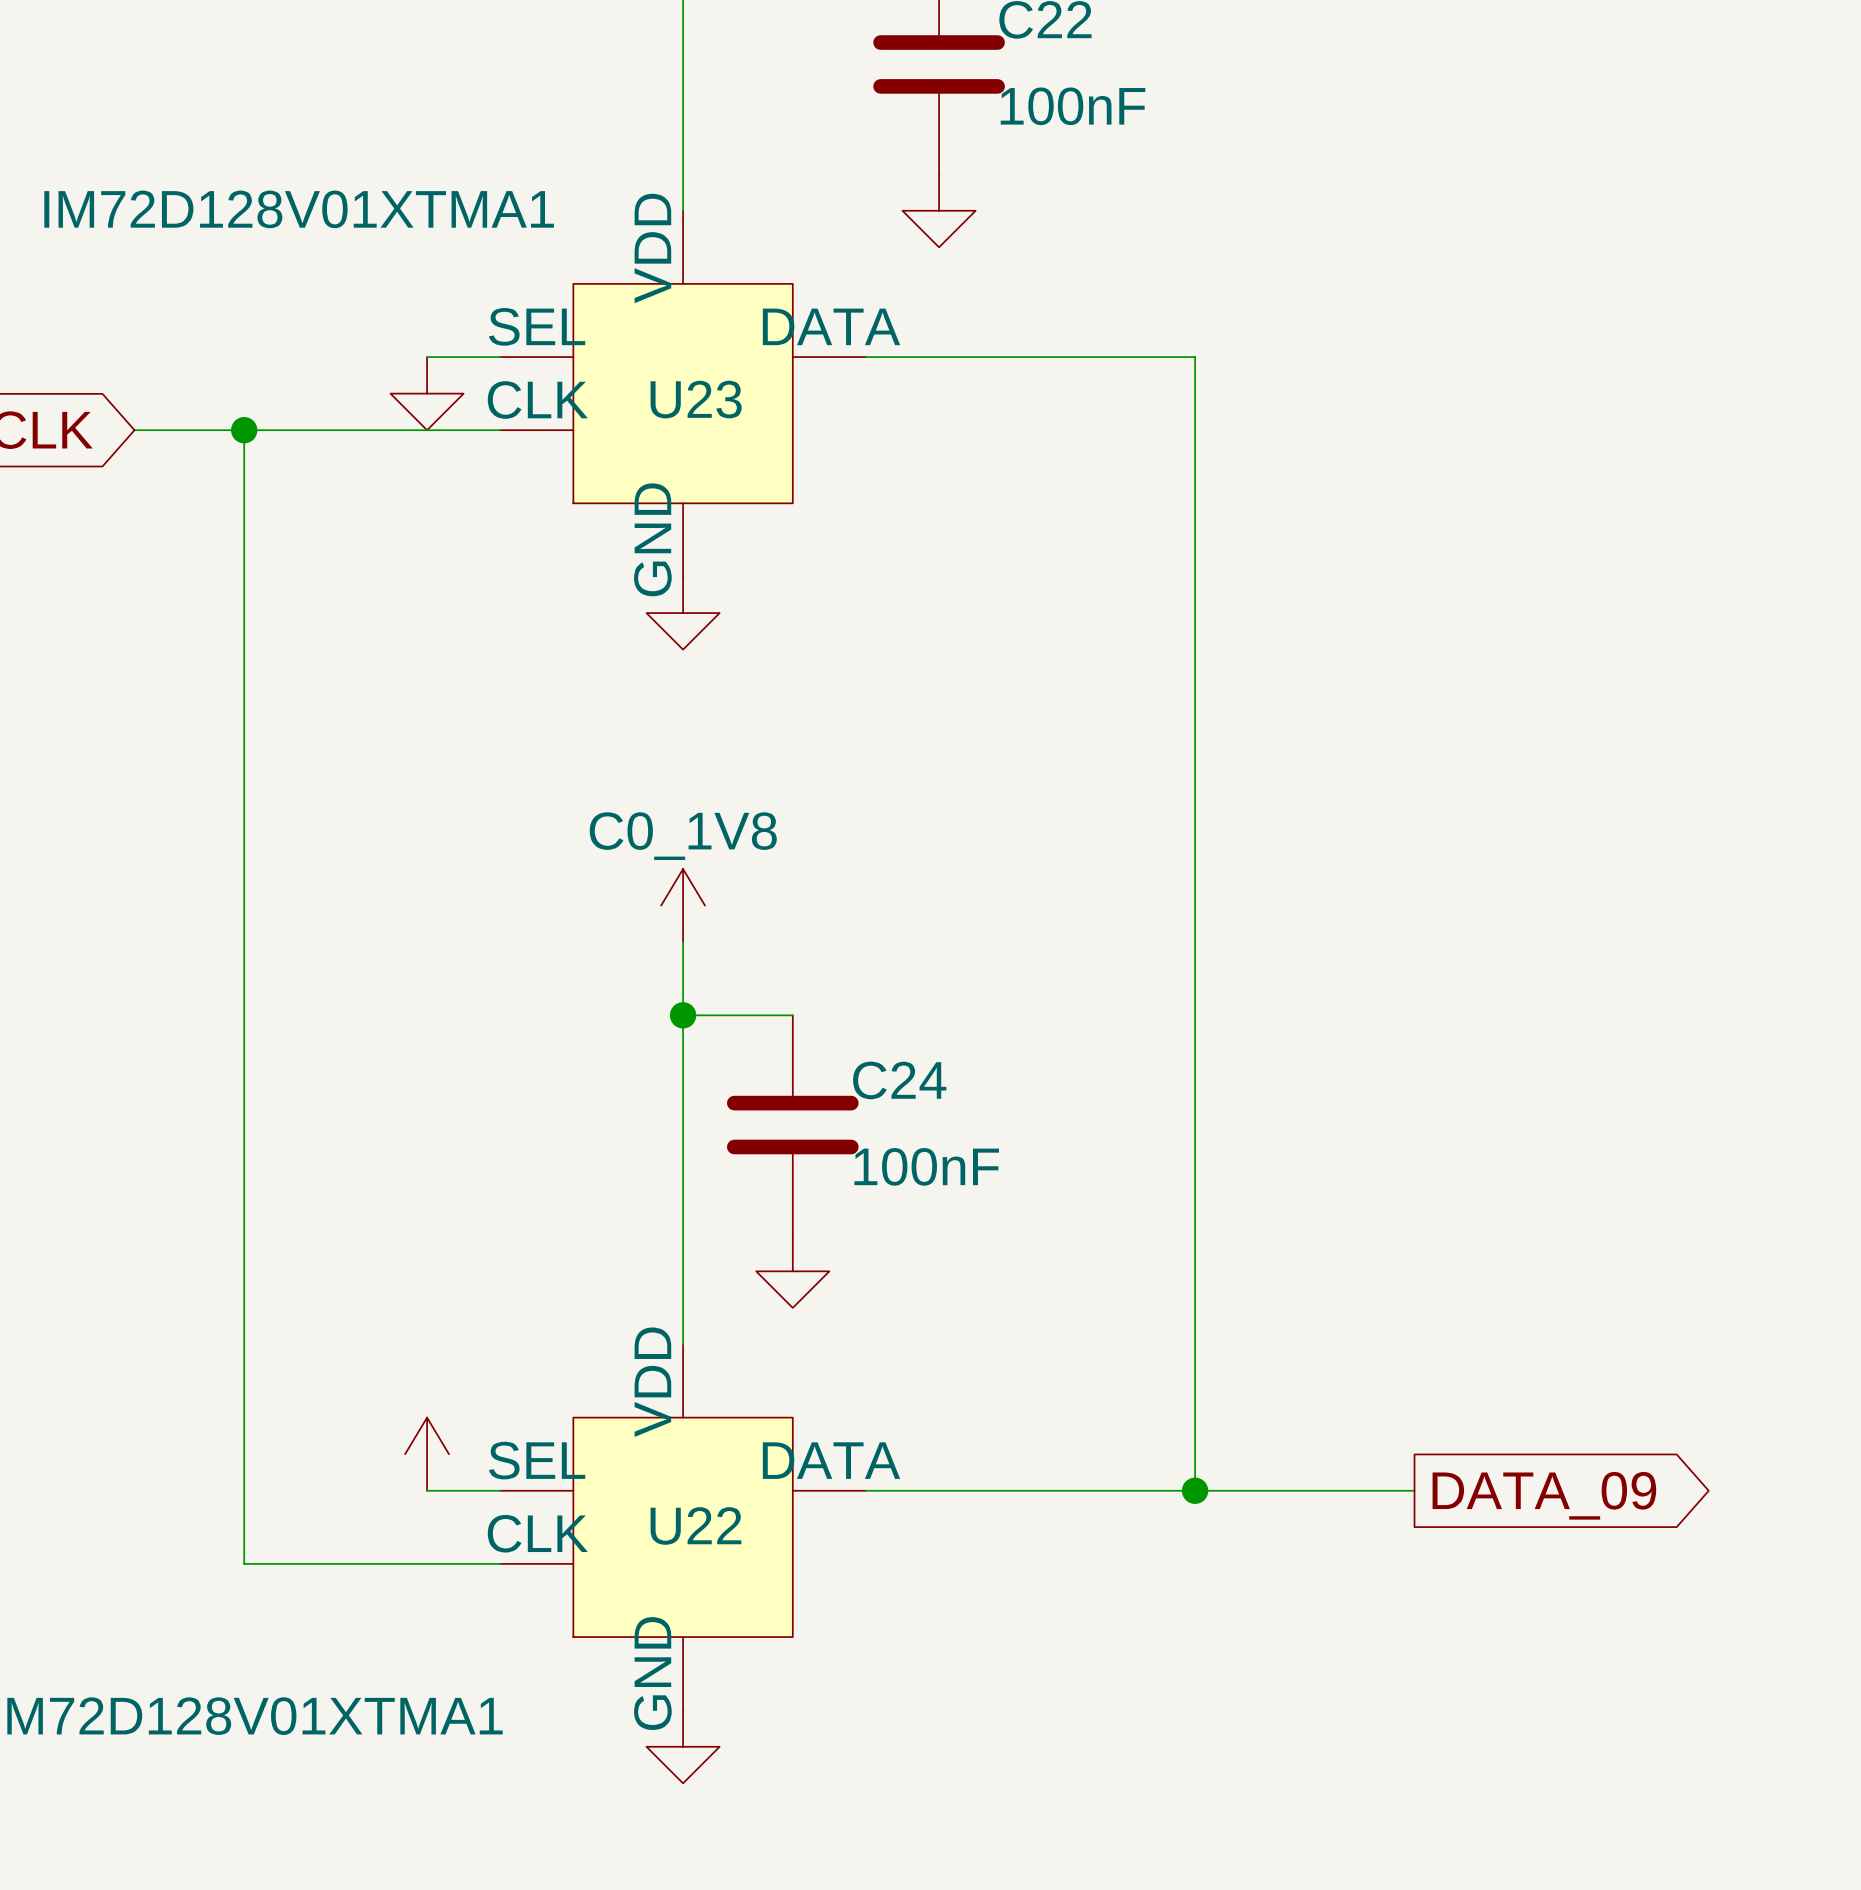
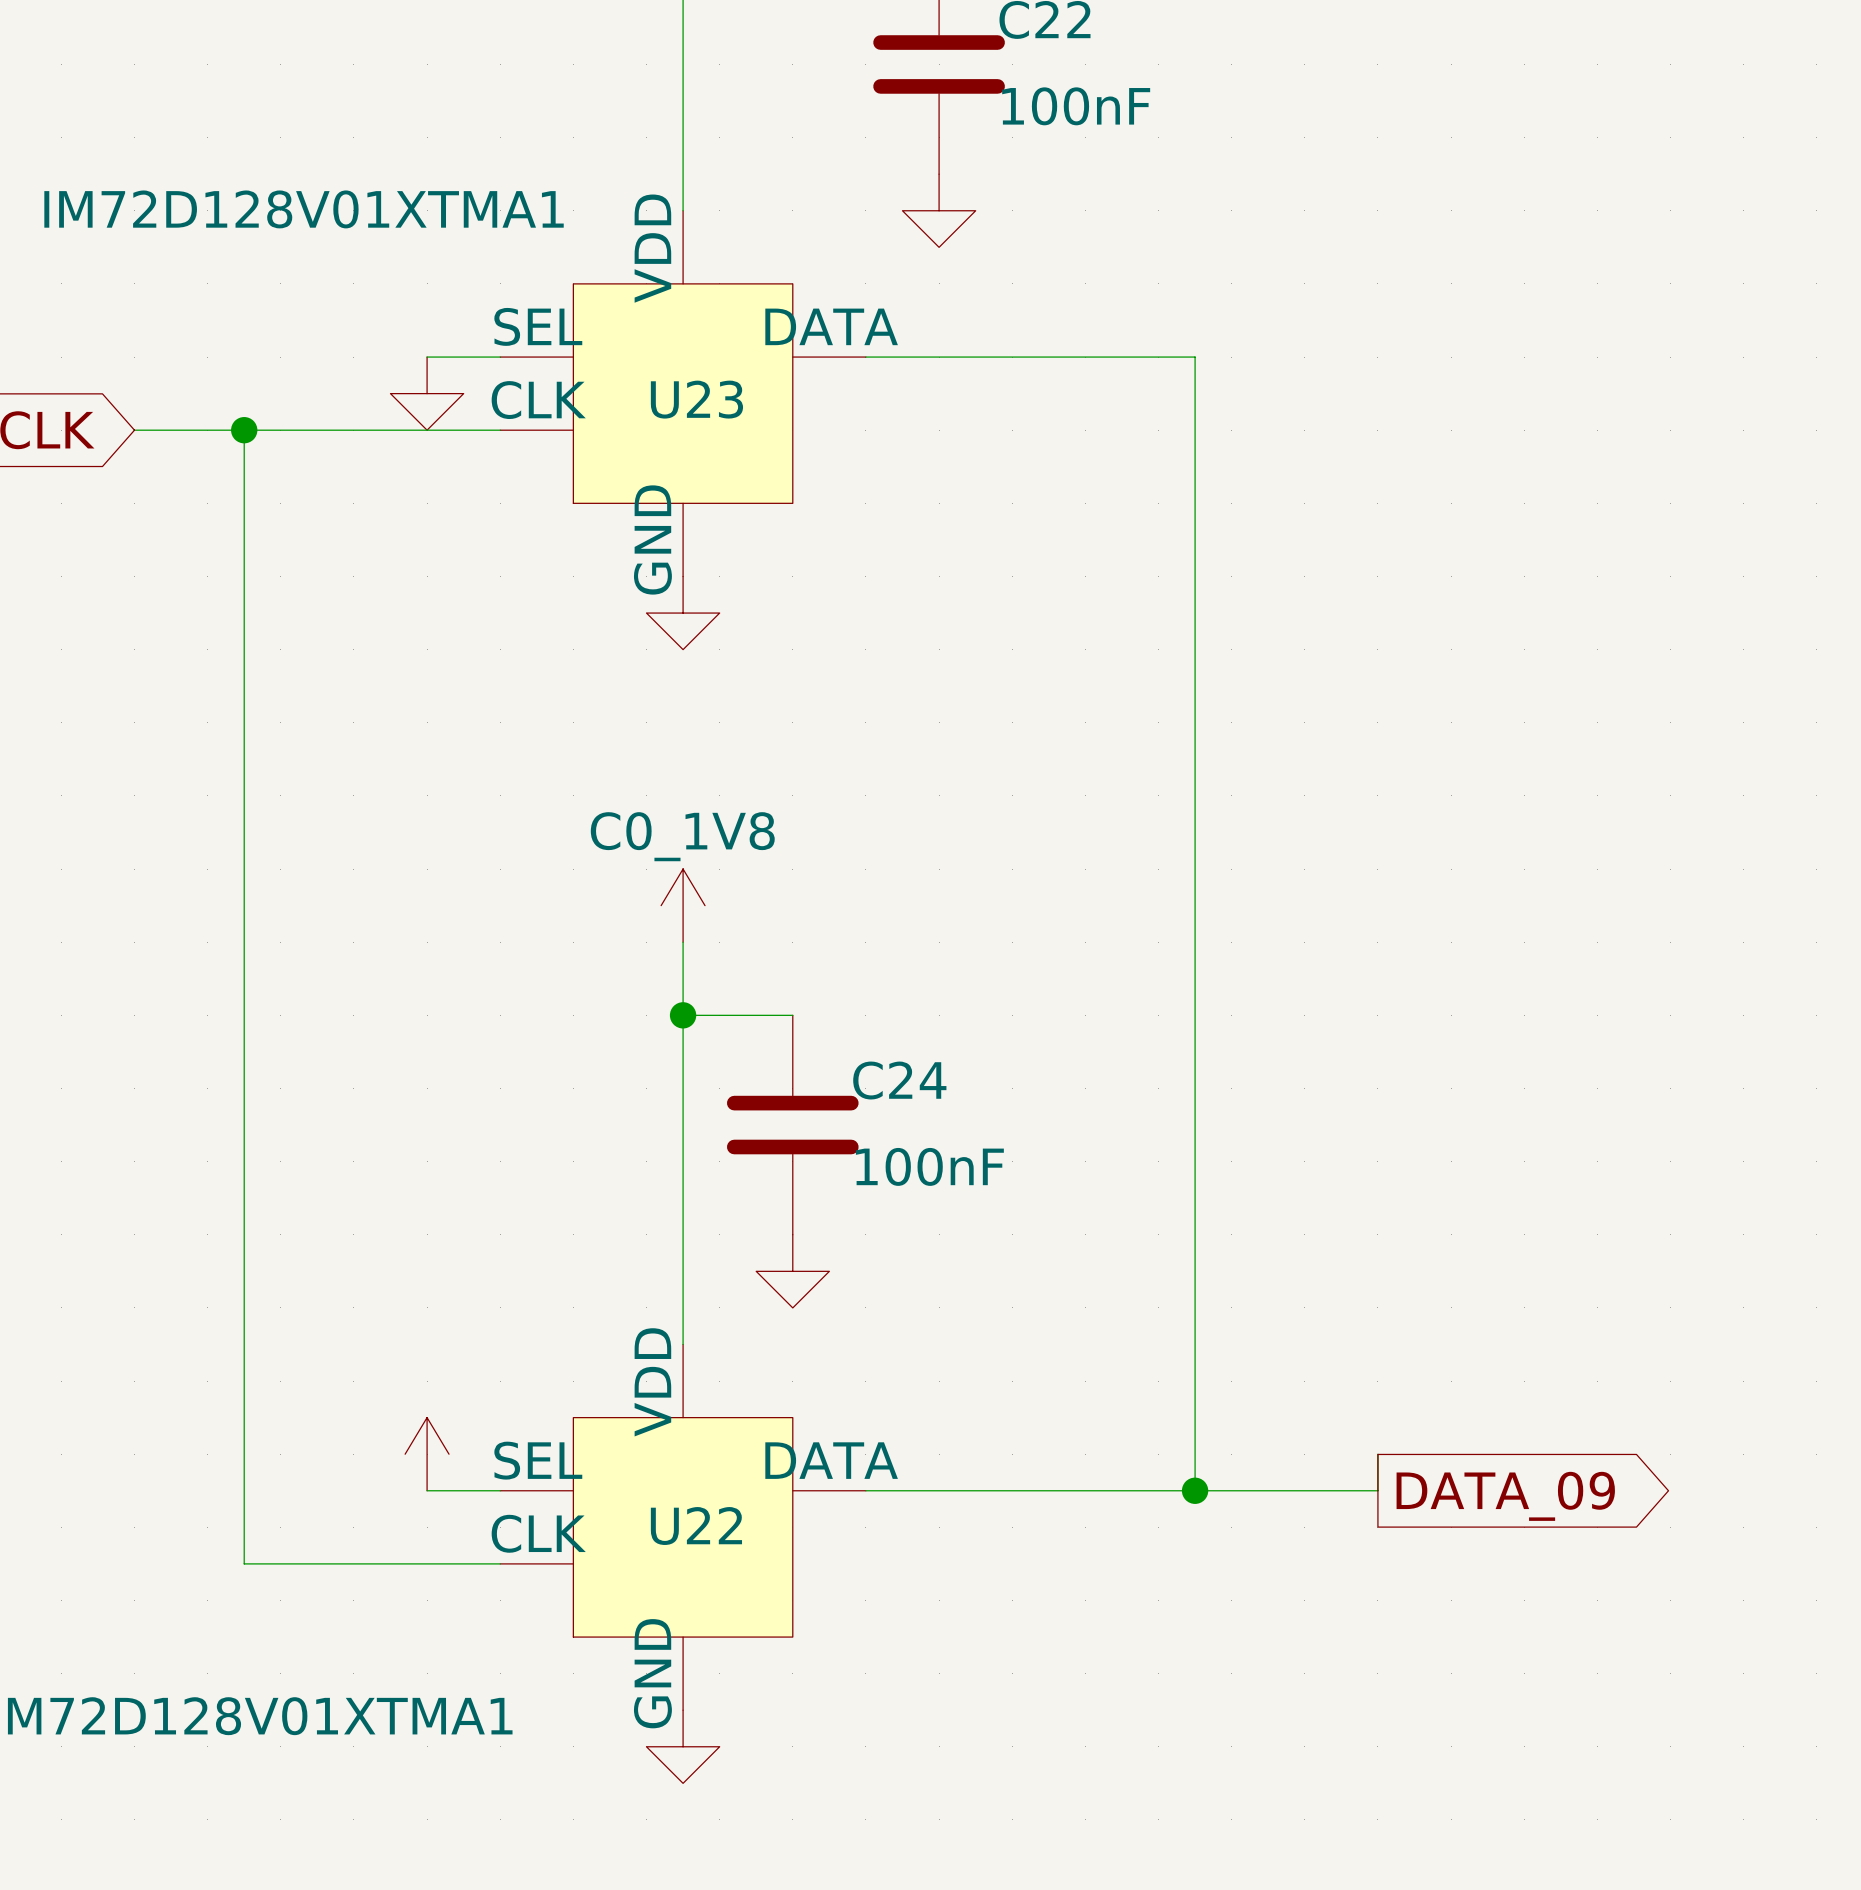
wire: (1377, 1490) (1414, 1490) -> (1377, 1490) (1377, 1454)
global label position: DATA_09 (1544, 1495) -> DATA_09 (1505, 1496)

